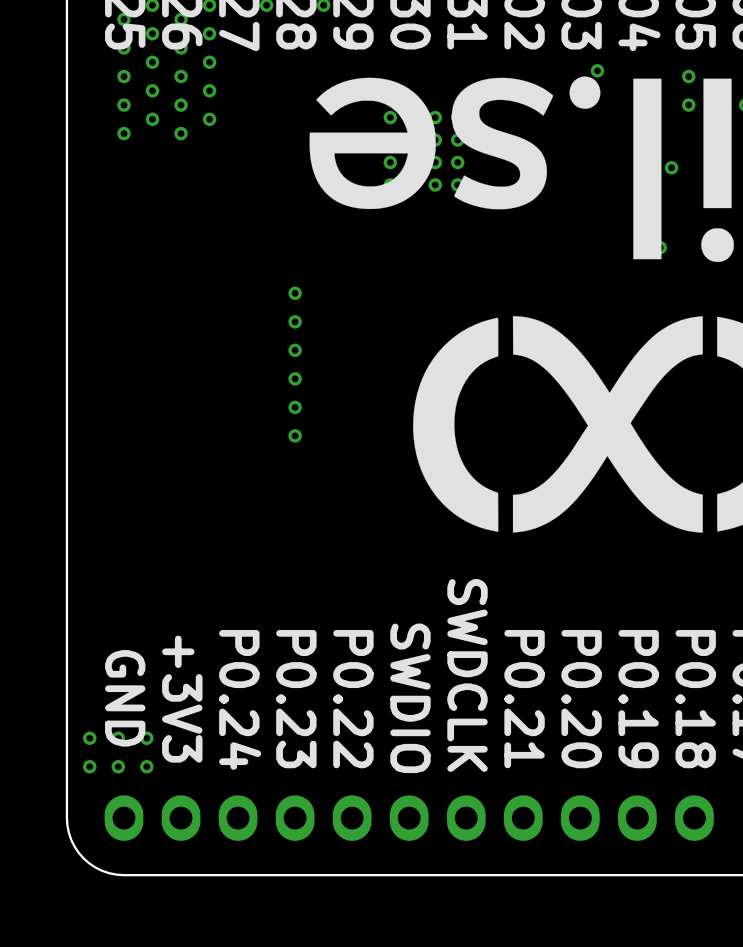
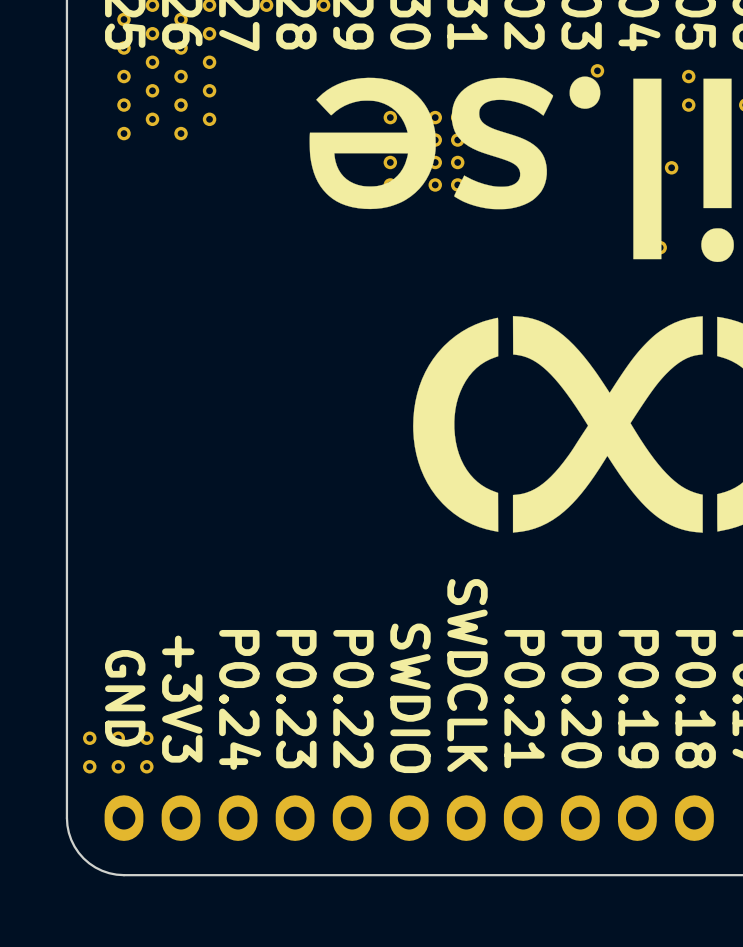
part: (295, 293) -> none
part: (295, 321) -> none
part: (295, 350) -> none
part: (295, 378) -> none
part: (295, 407) -> none
part: (295, 435) -> none

